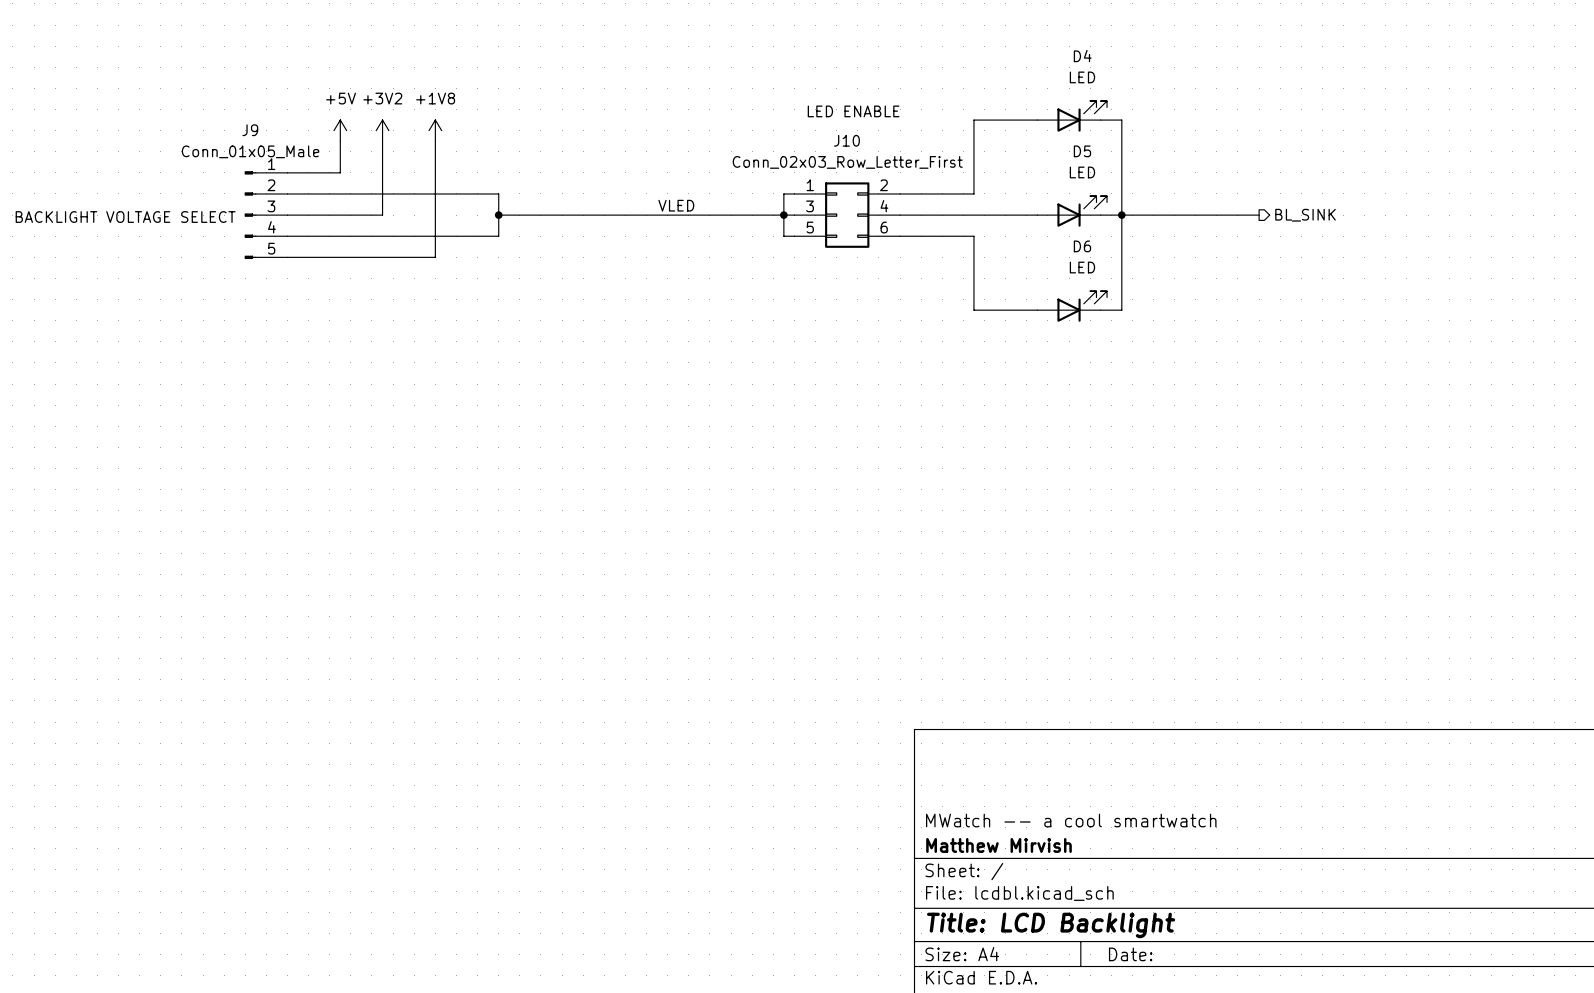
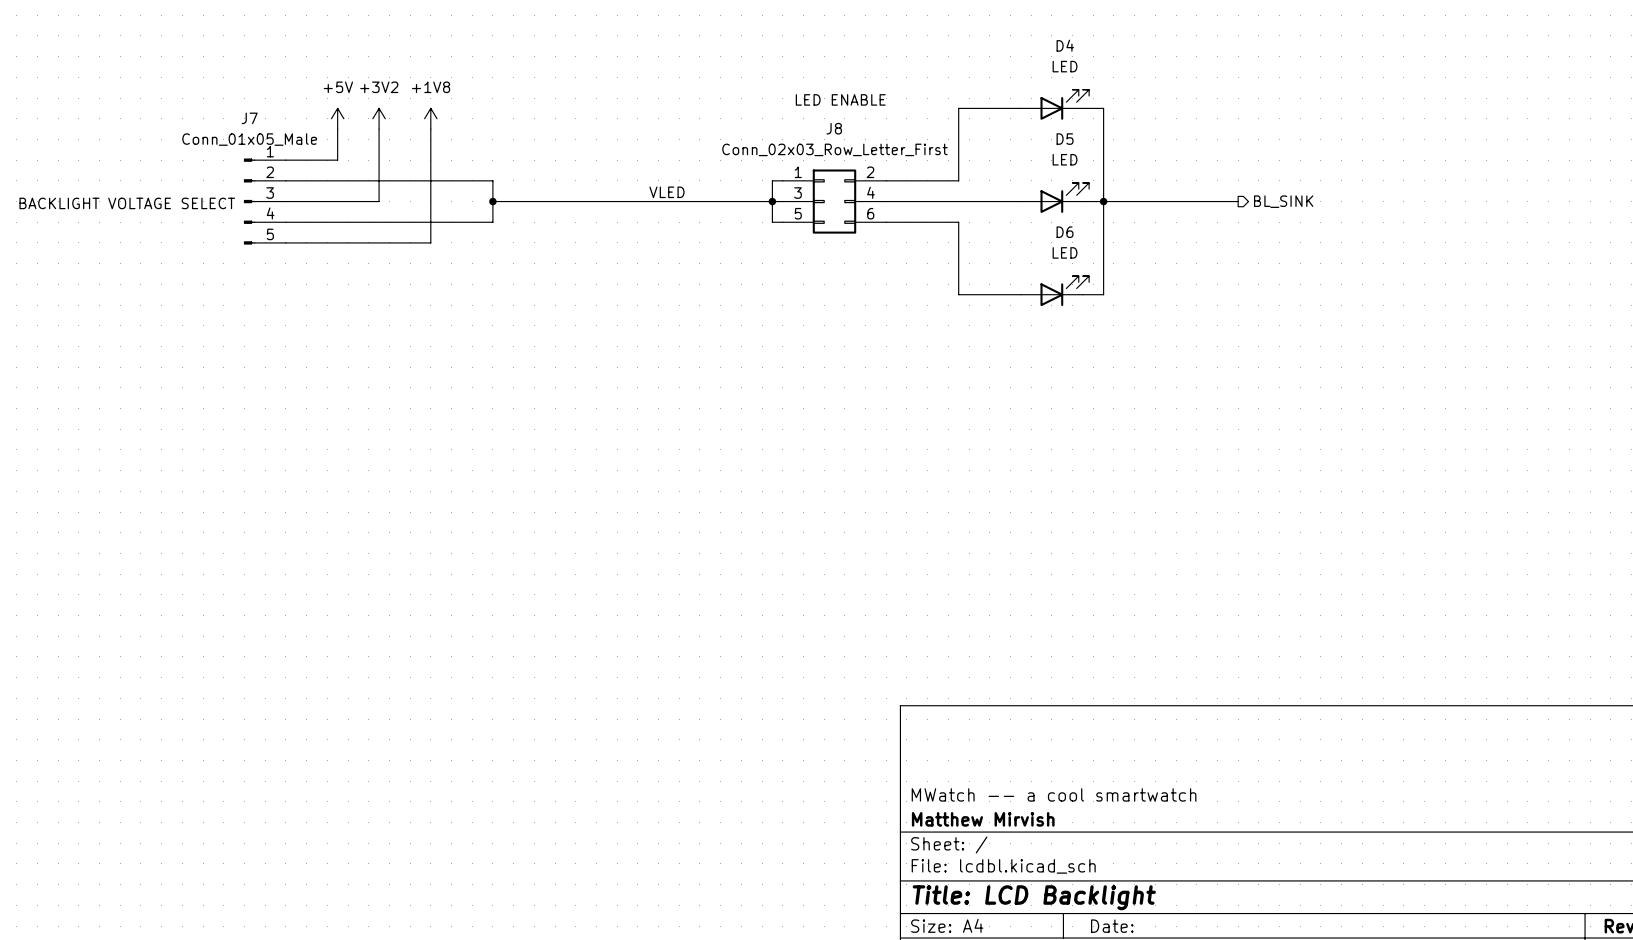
J9 name: J9 (250, 130) -> J7 (249, 118)
J10 name: J10 (846, 140) -> J8 (834, 128)

